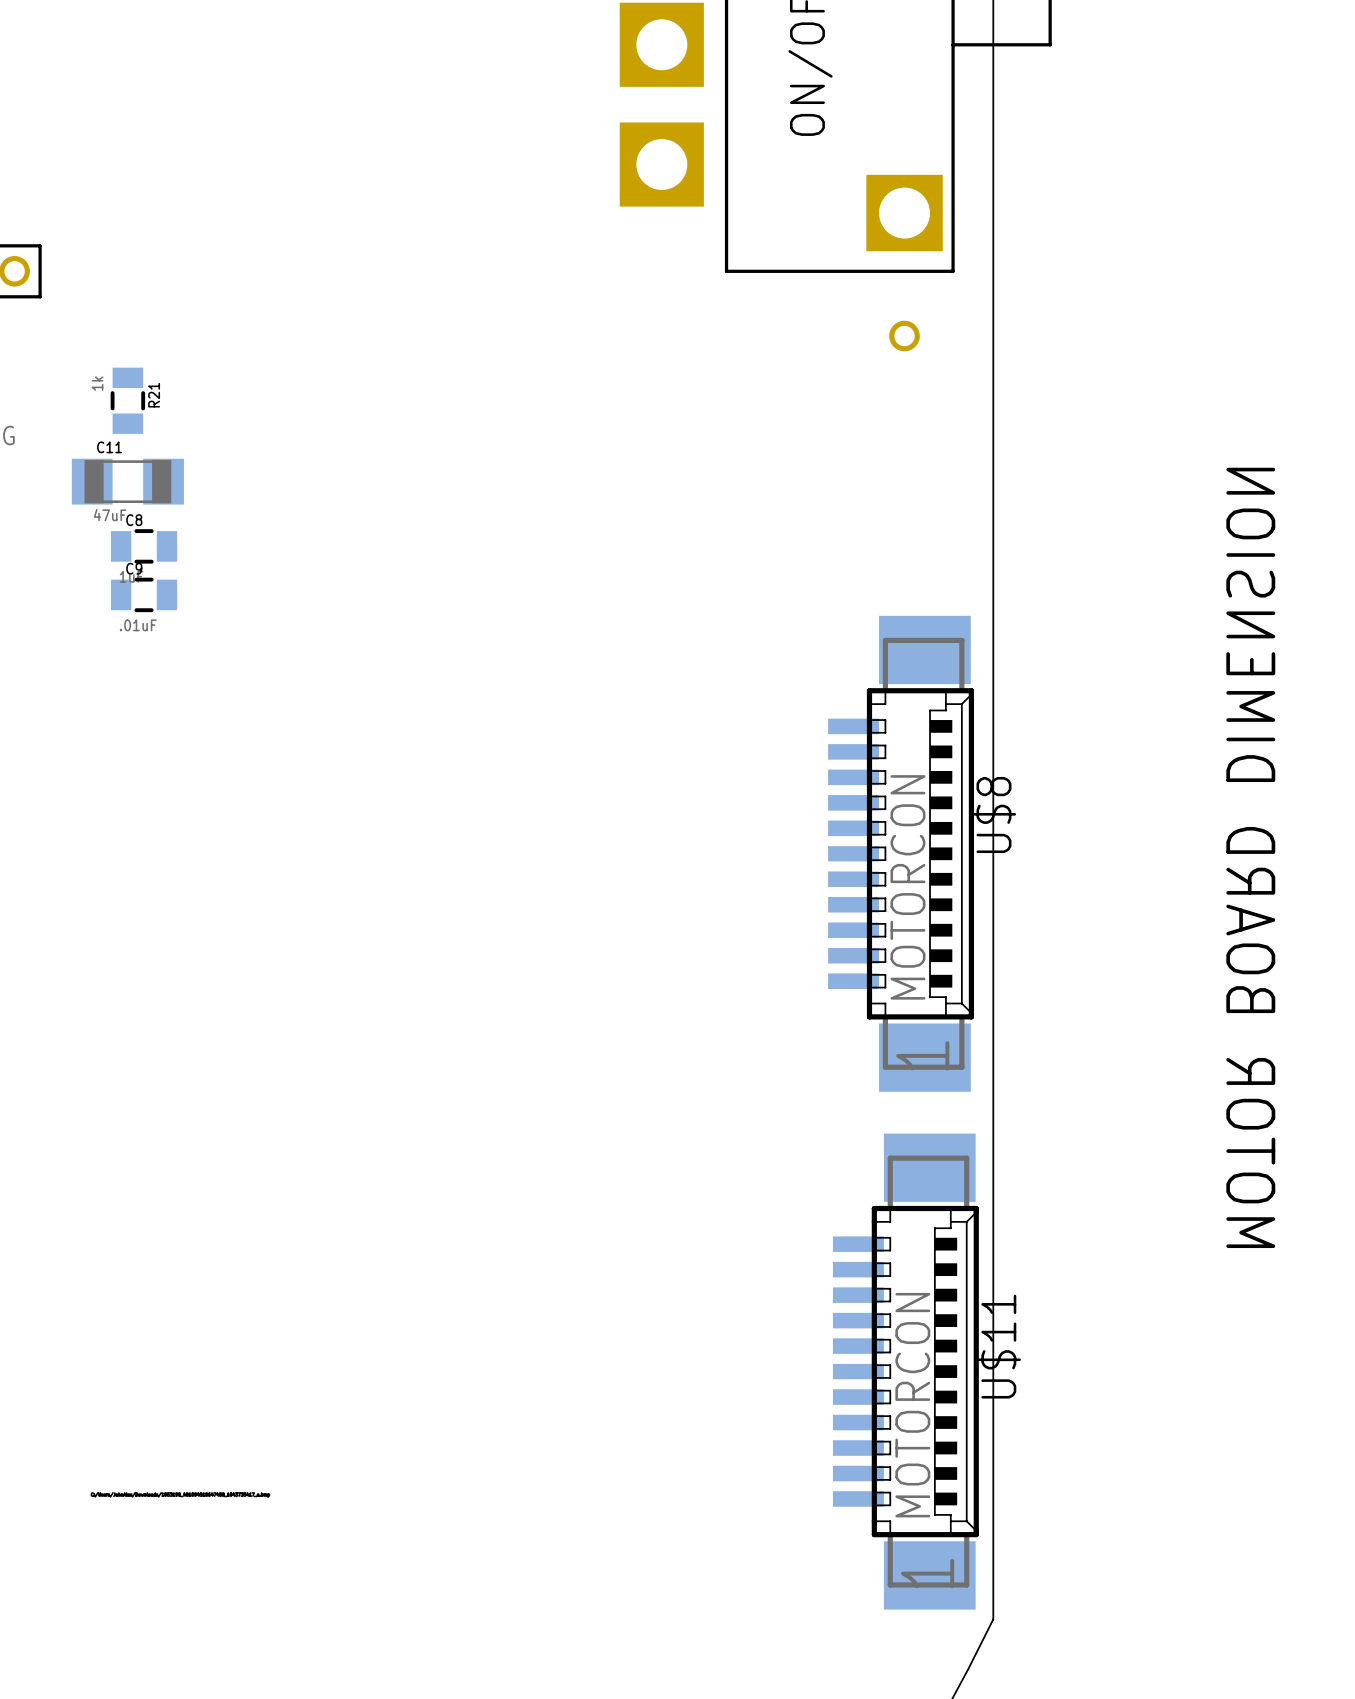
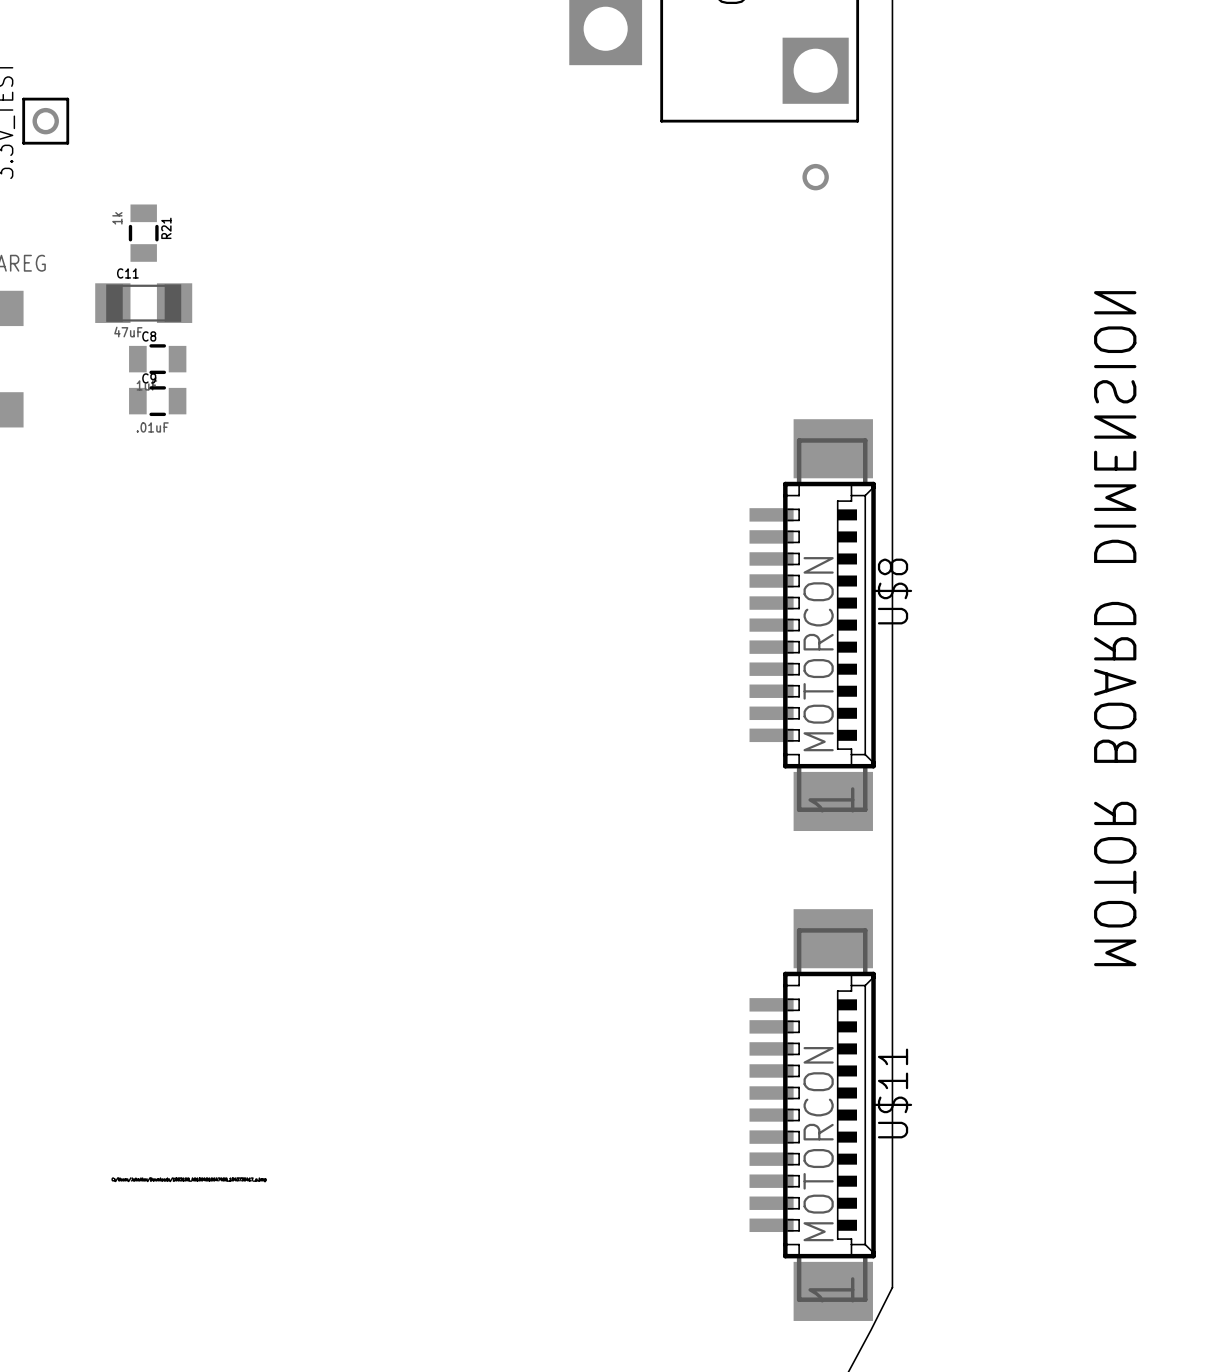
U$11 position: (905, 1371) -> (812, 1115)

